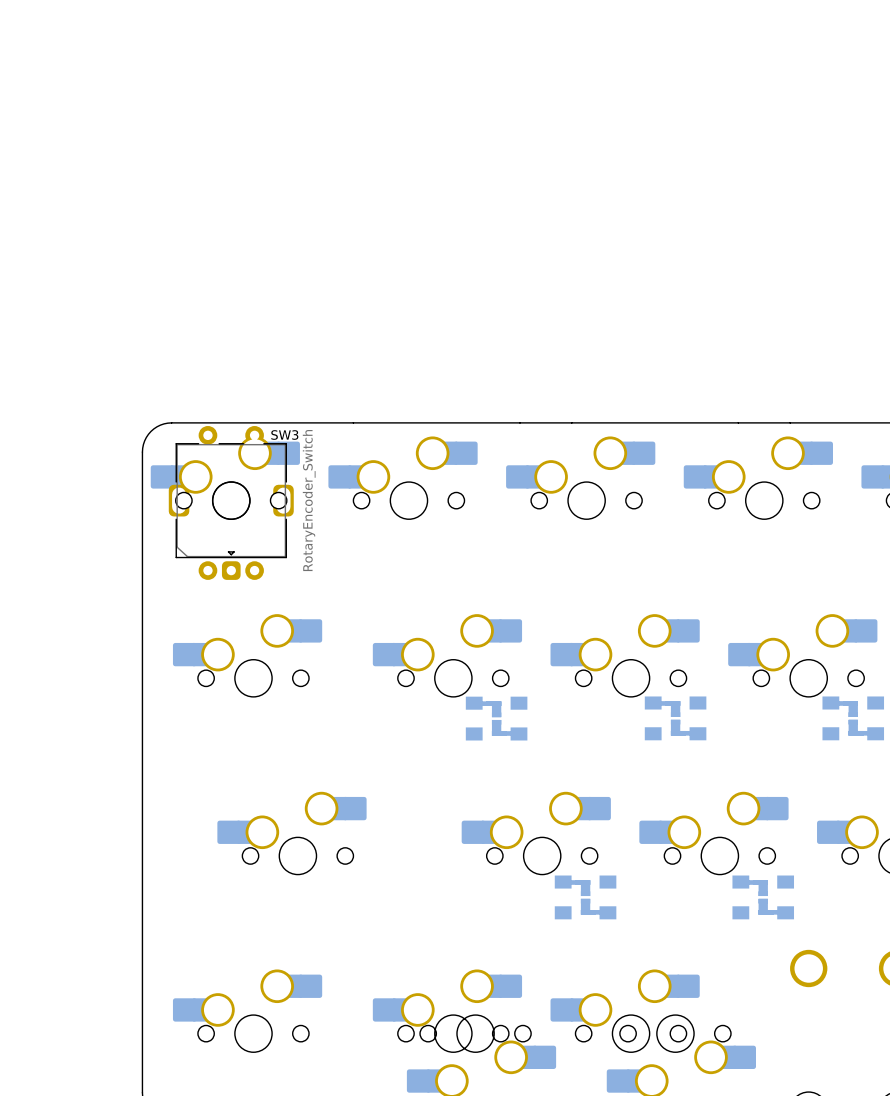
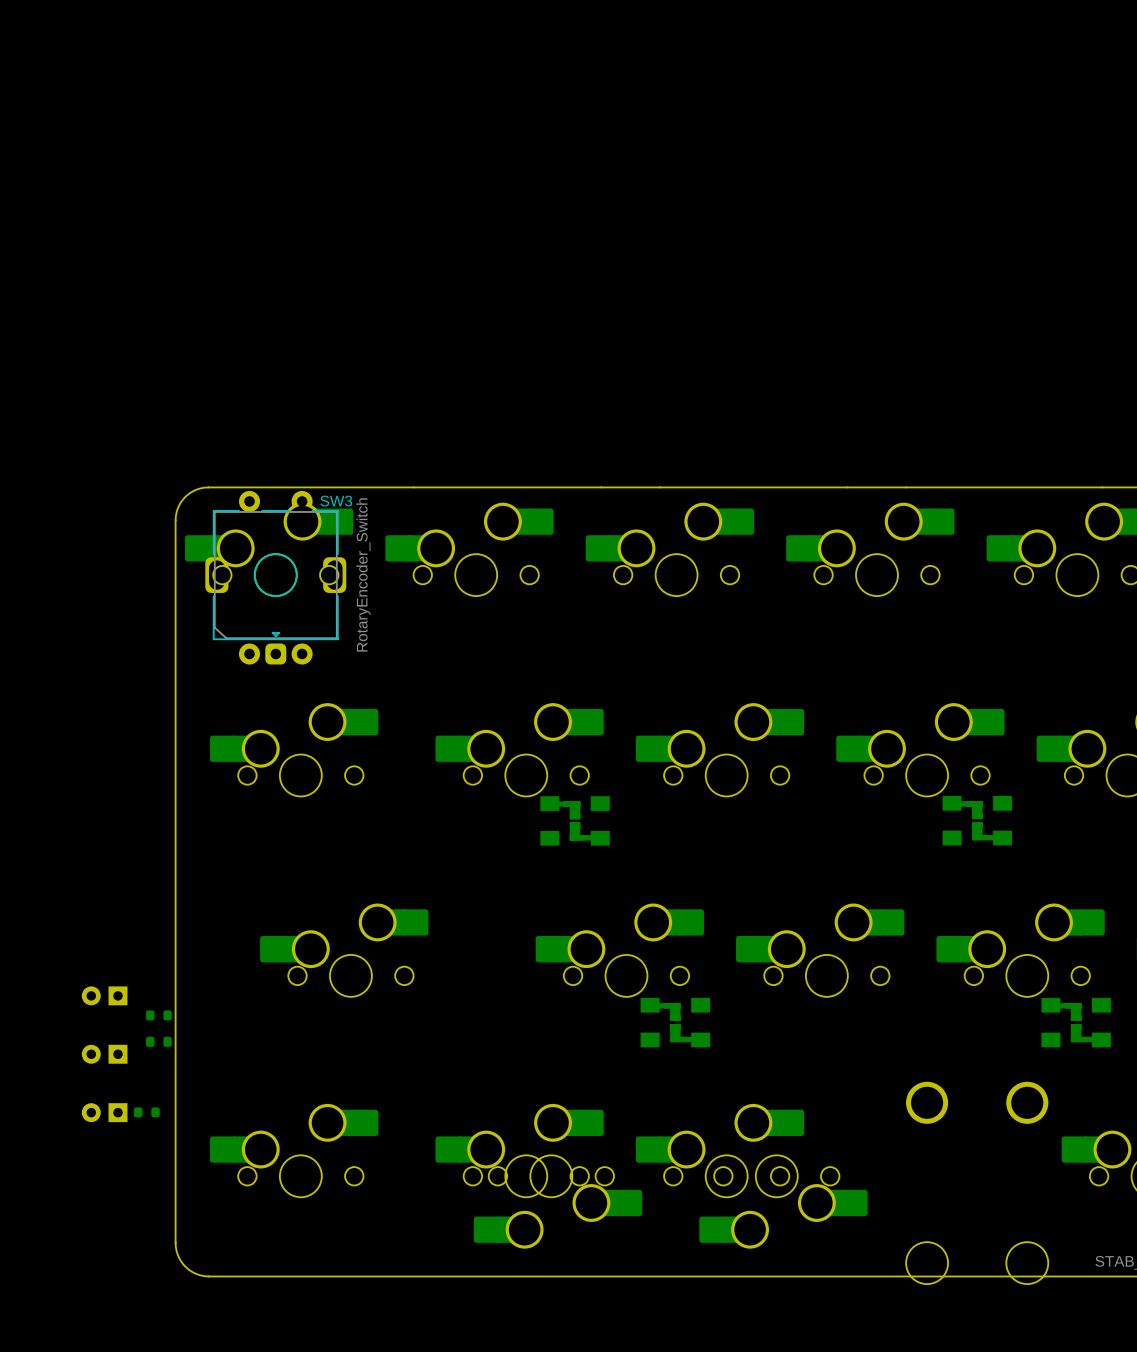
part: (675, 718) -> none
part: none -> (104, 995)
part: none -> (158, 1015)
part: (763, 897) -> none
part: none -> (158, 1041)
part: none -> (104, 1054)
part: none -> (104, 1112)
part: none -> (146, 1112)

